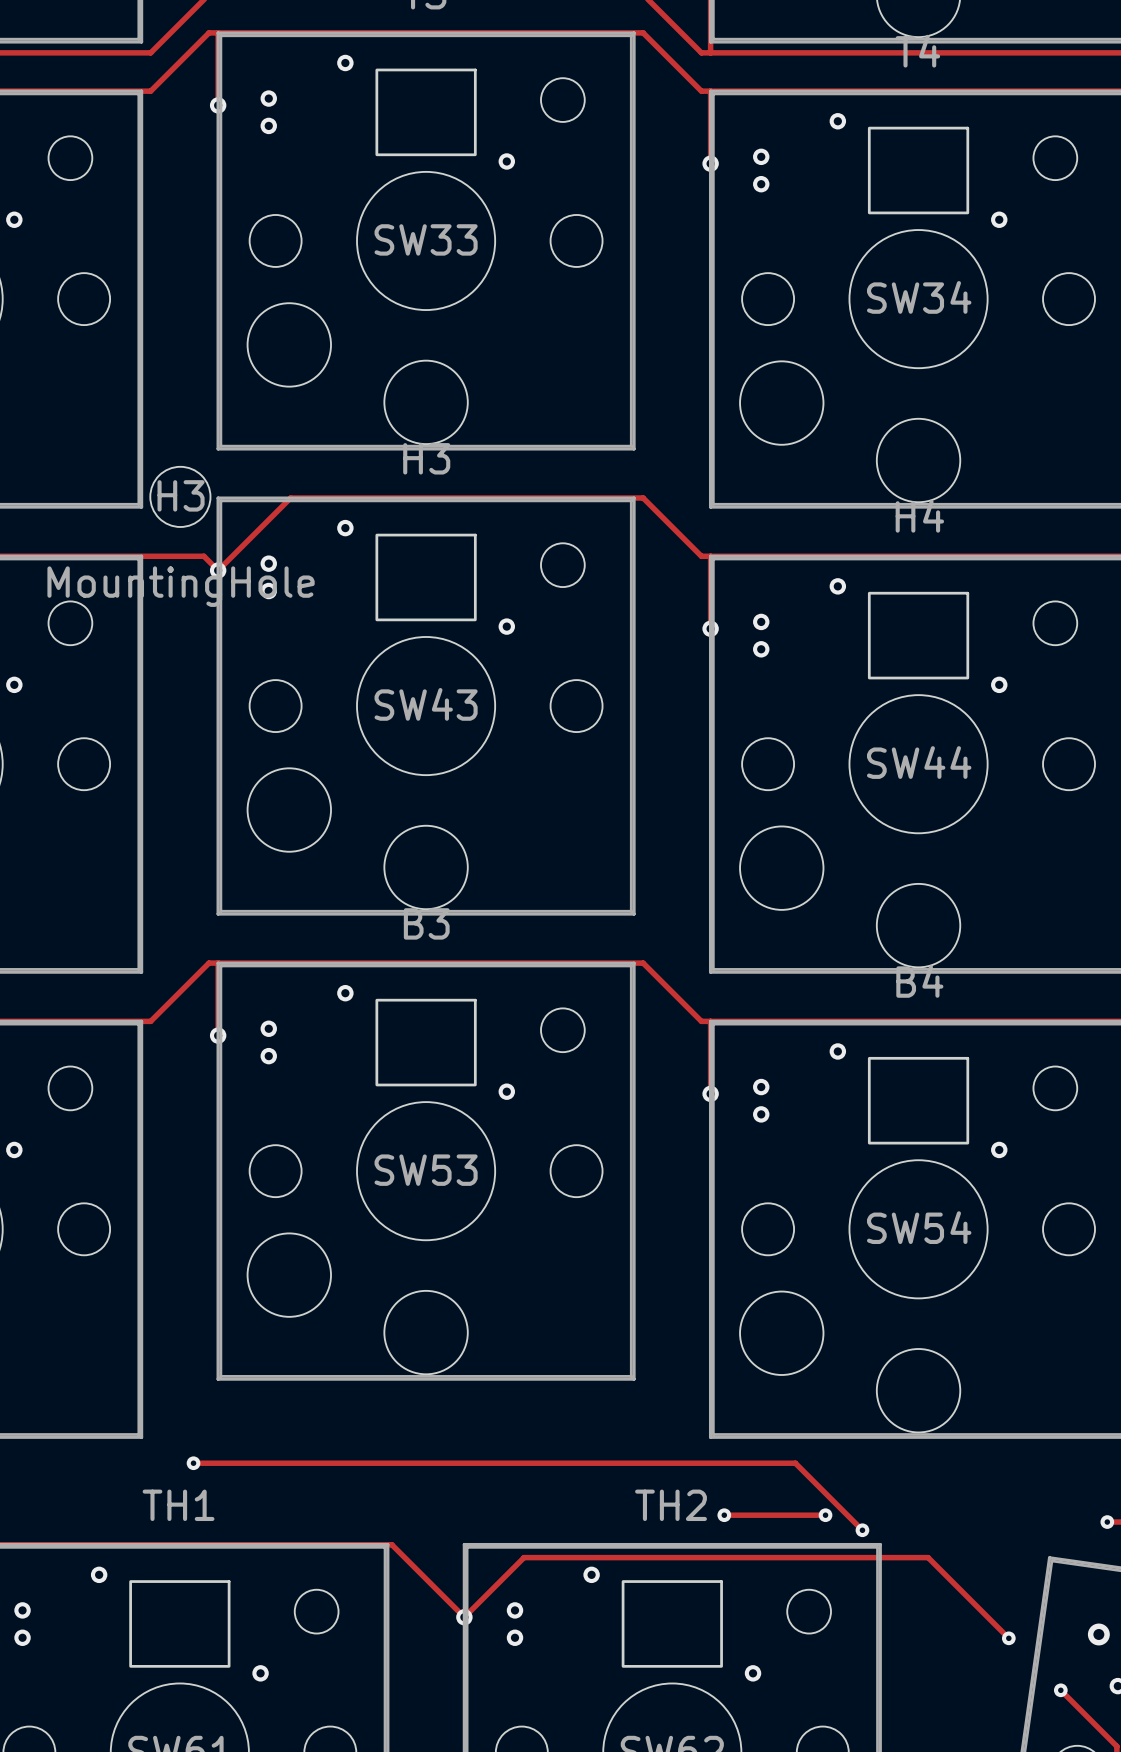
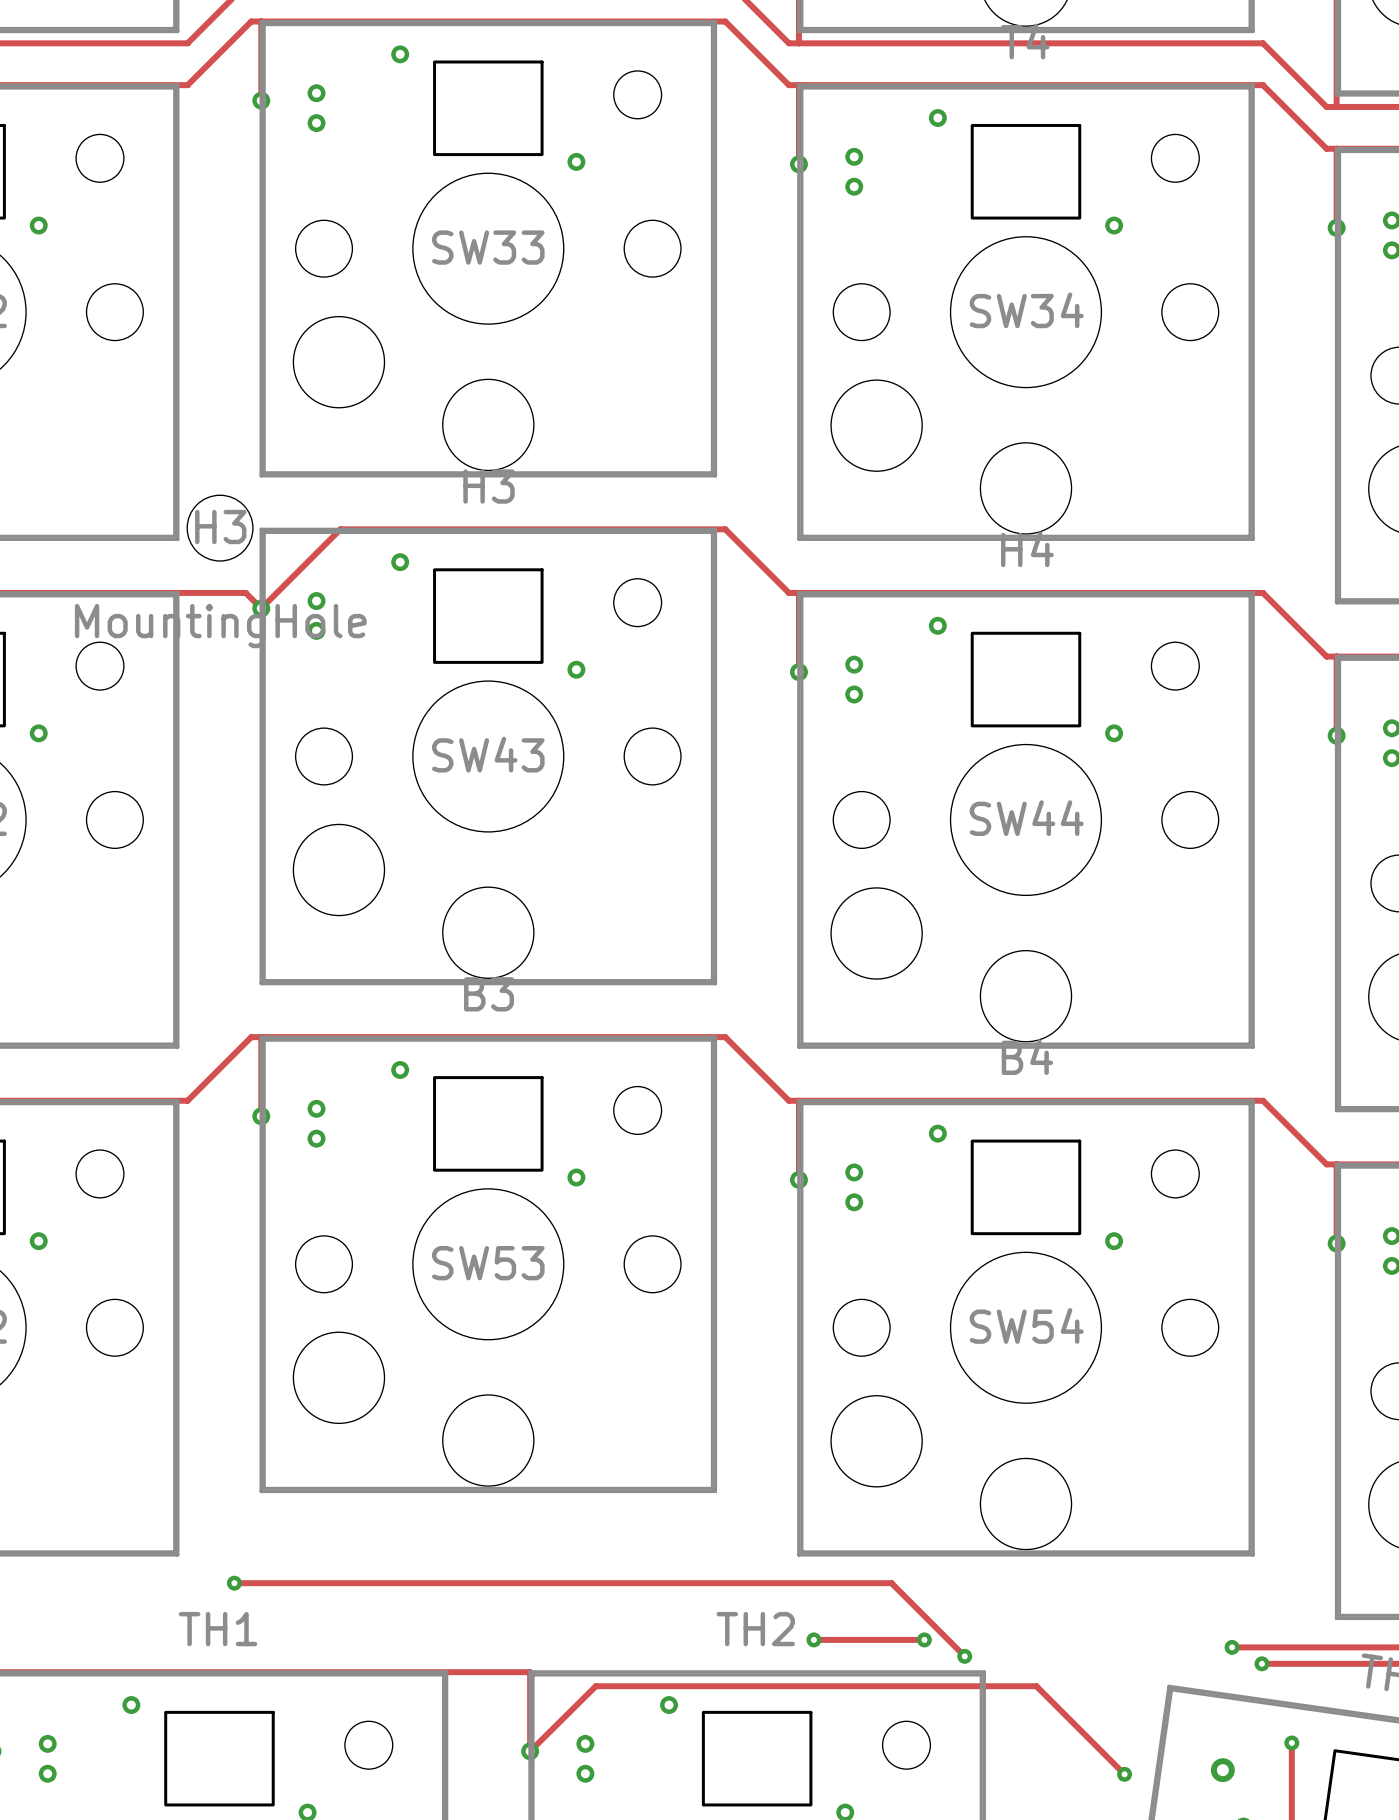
track: (391, 1544) (464, 1617) (524, 1557) -> (450, 1672) (530, 1672) (530, 1751) (595, 1686)

